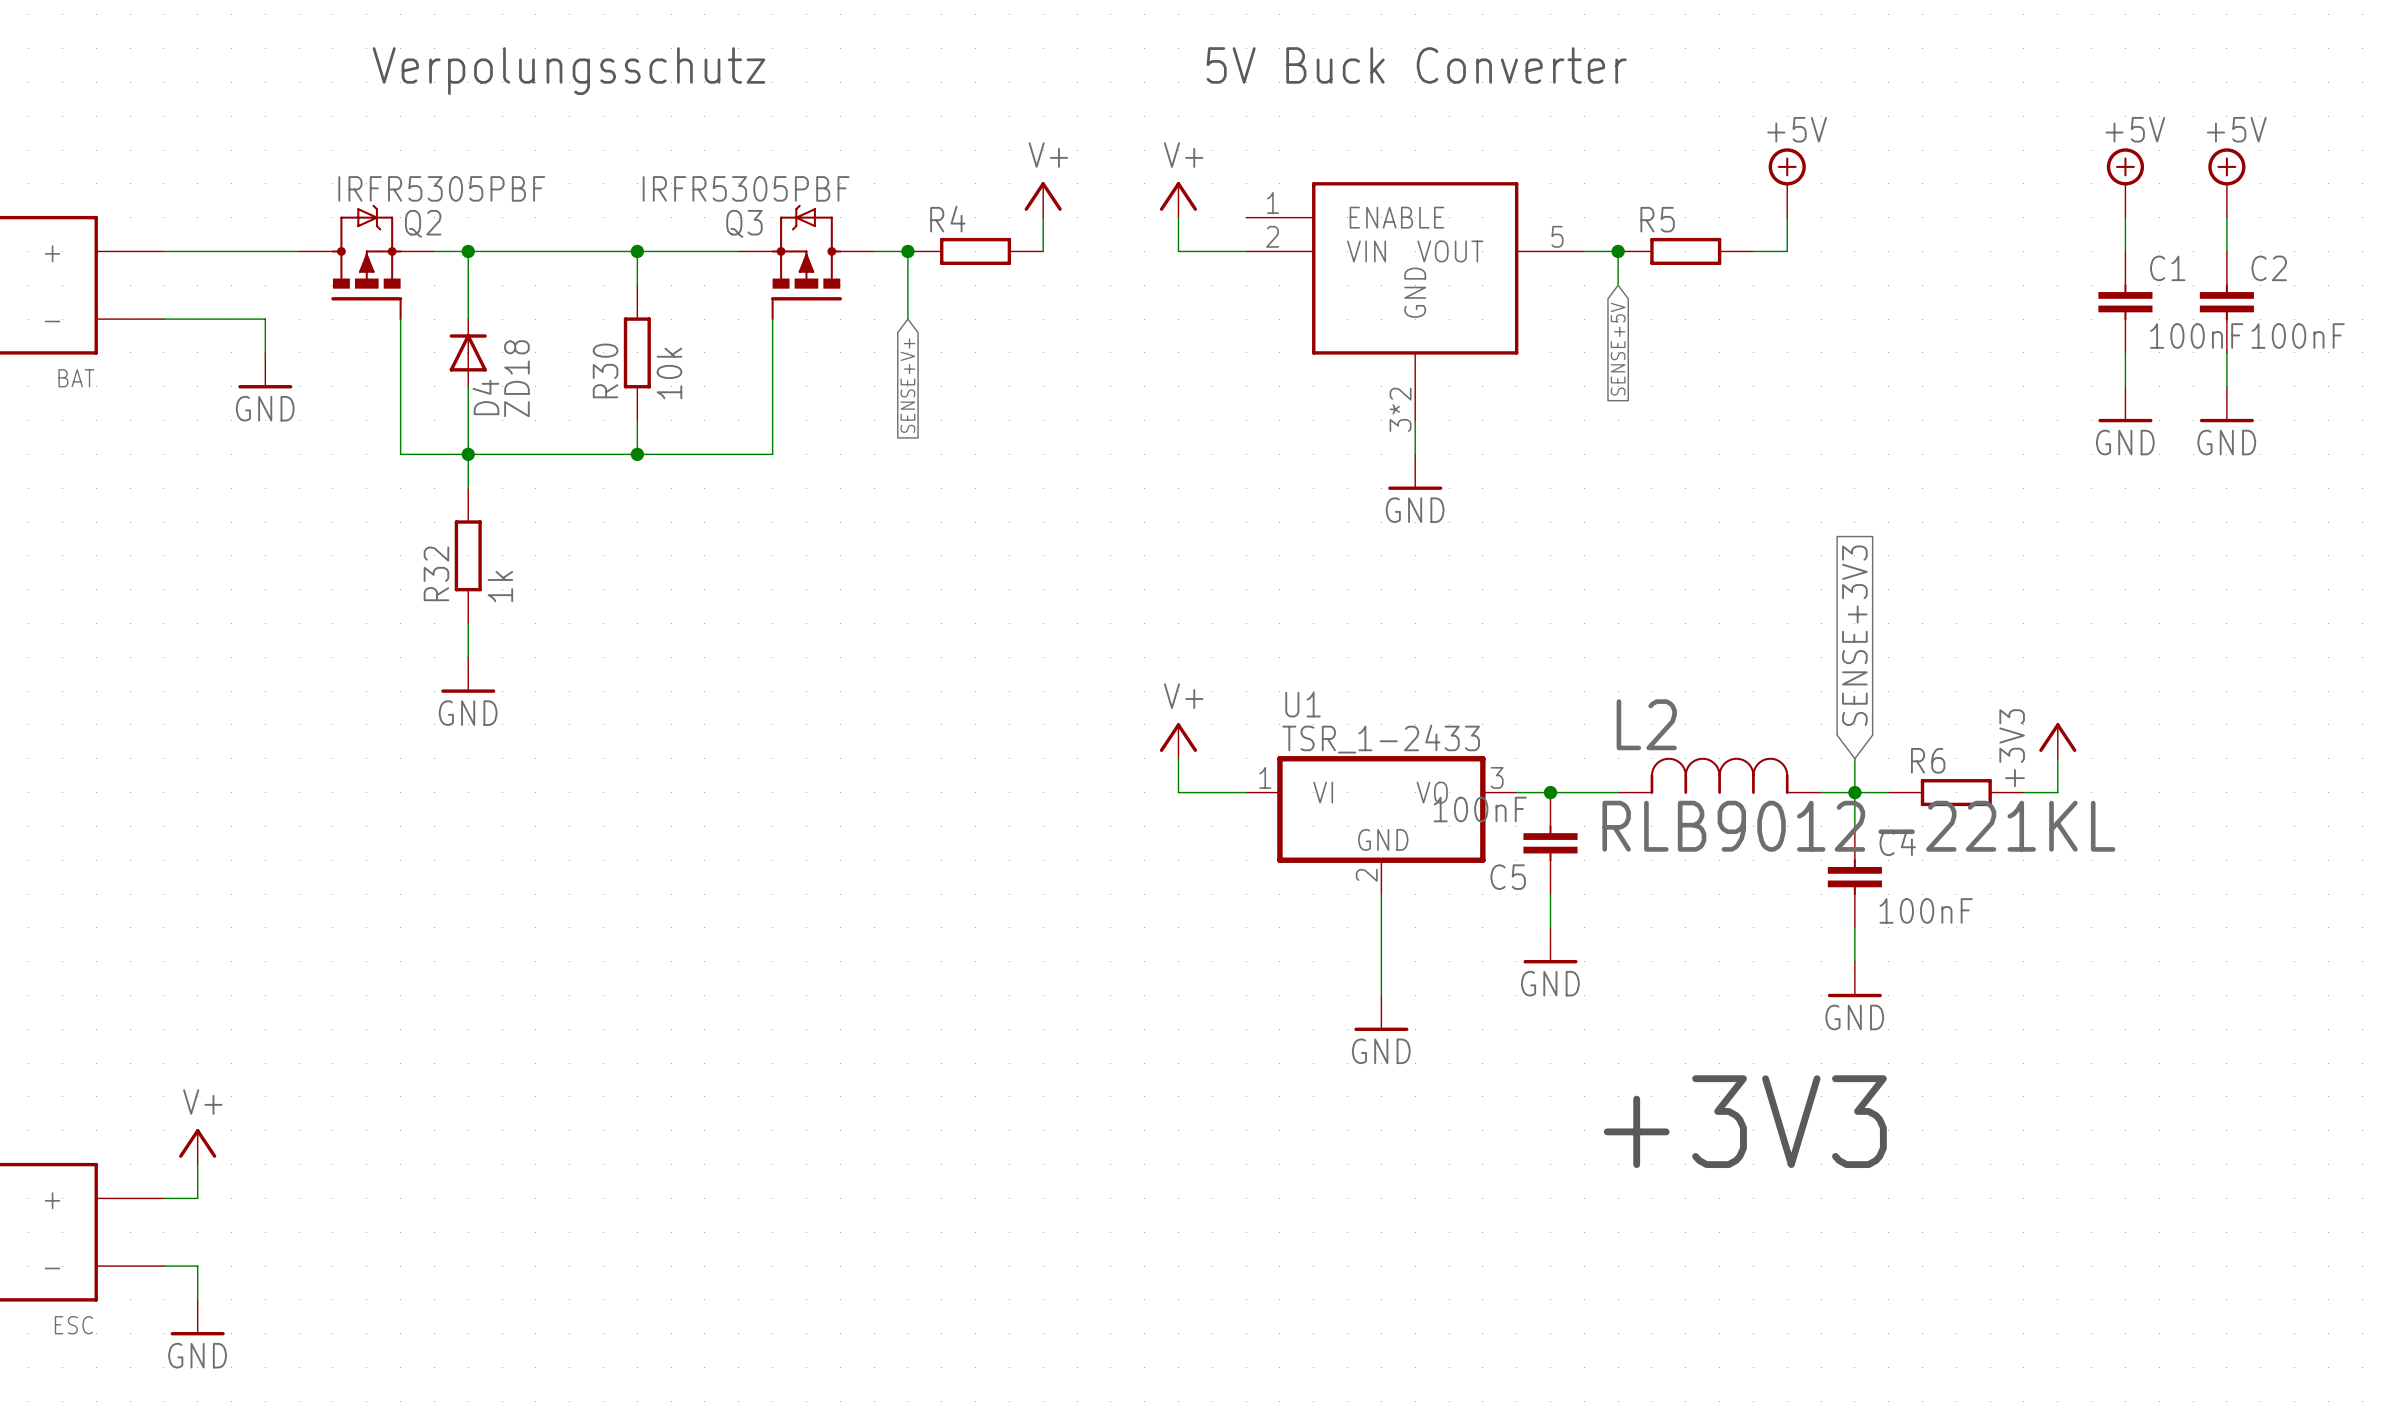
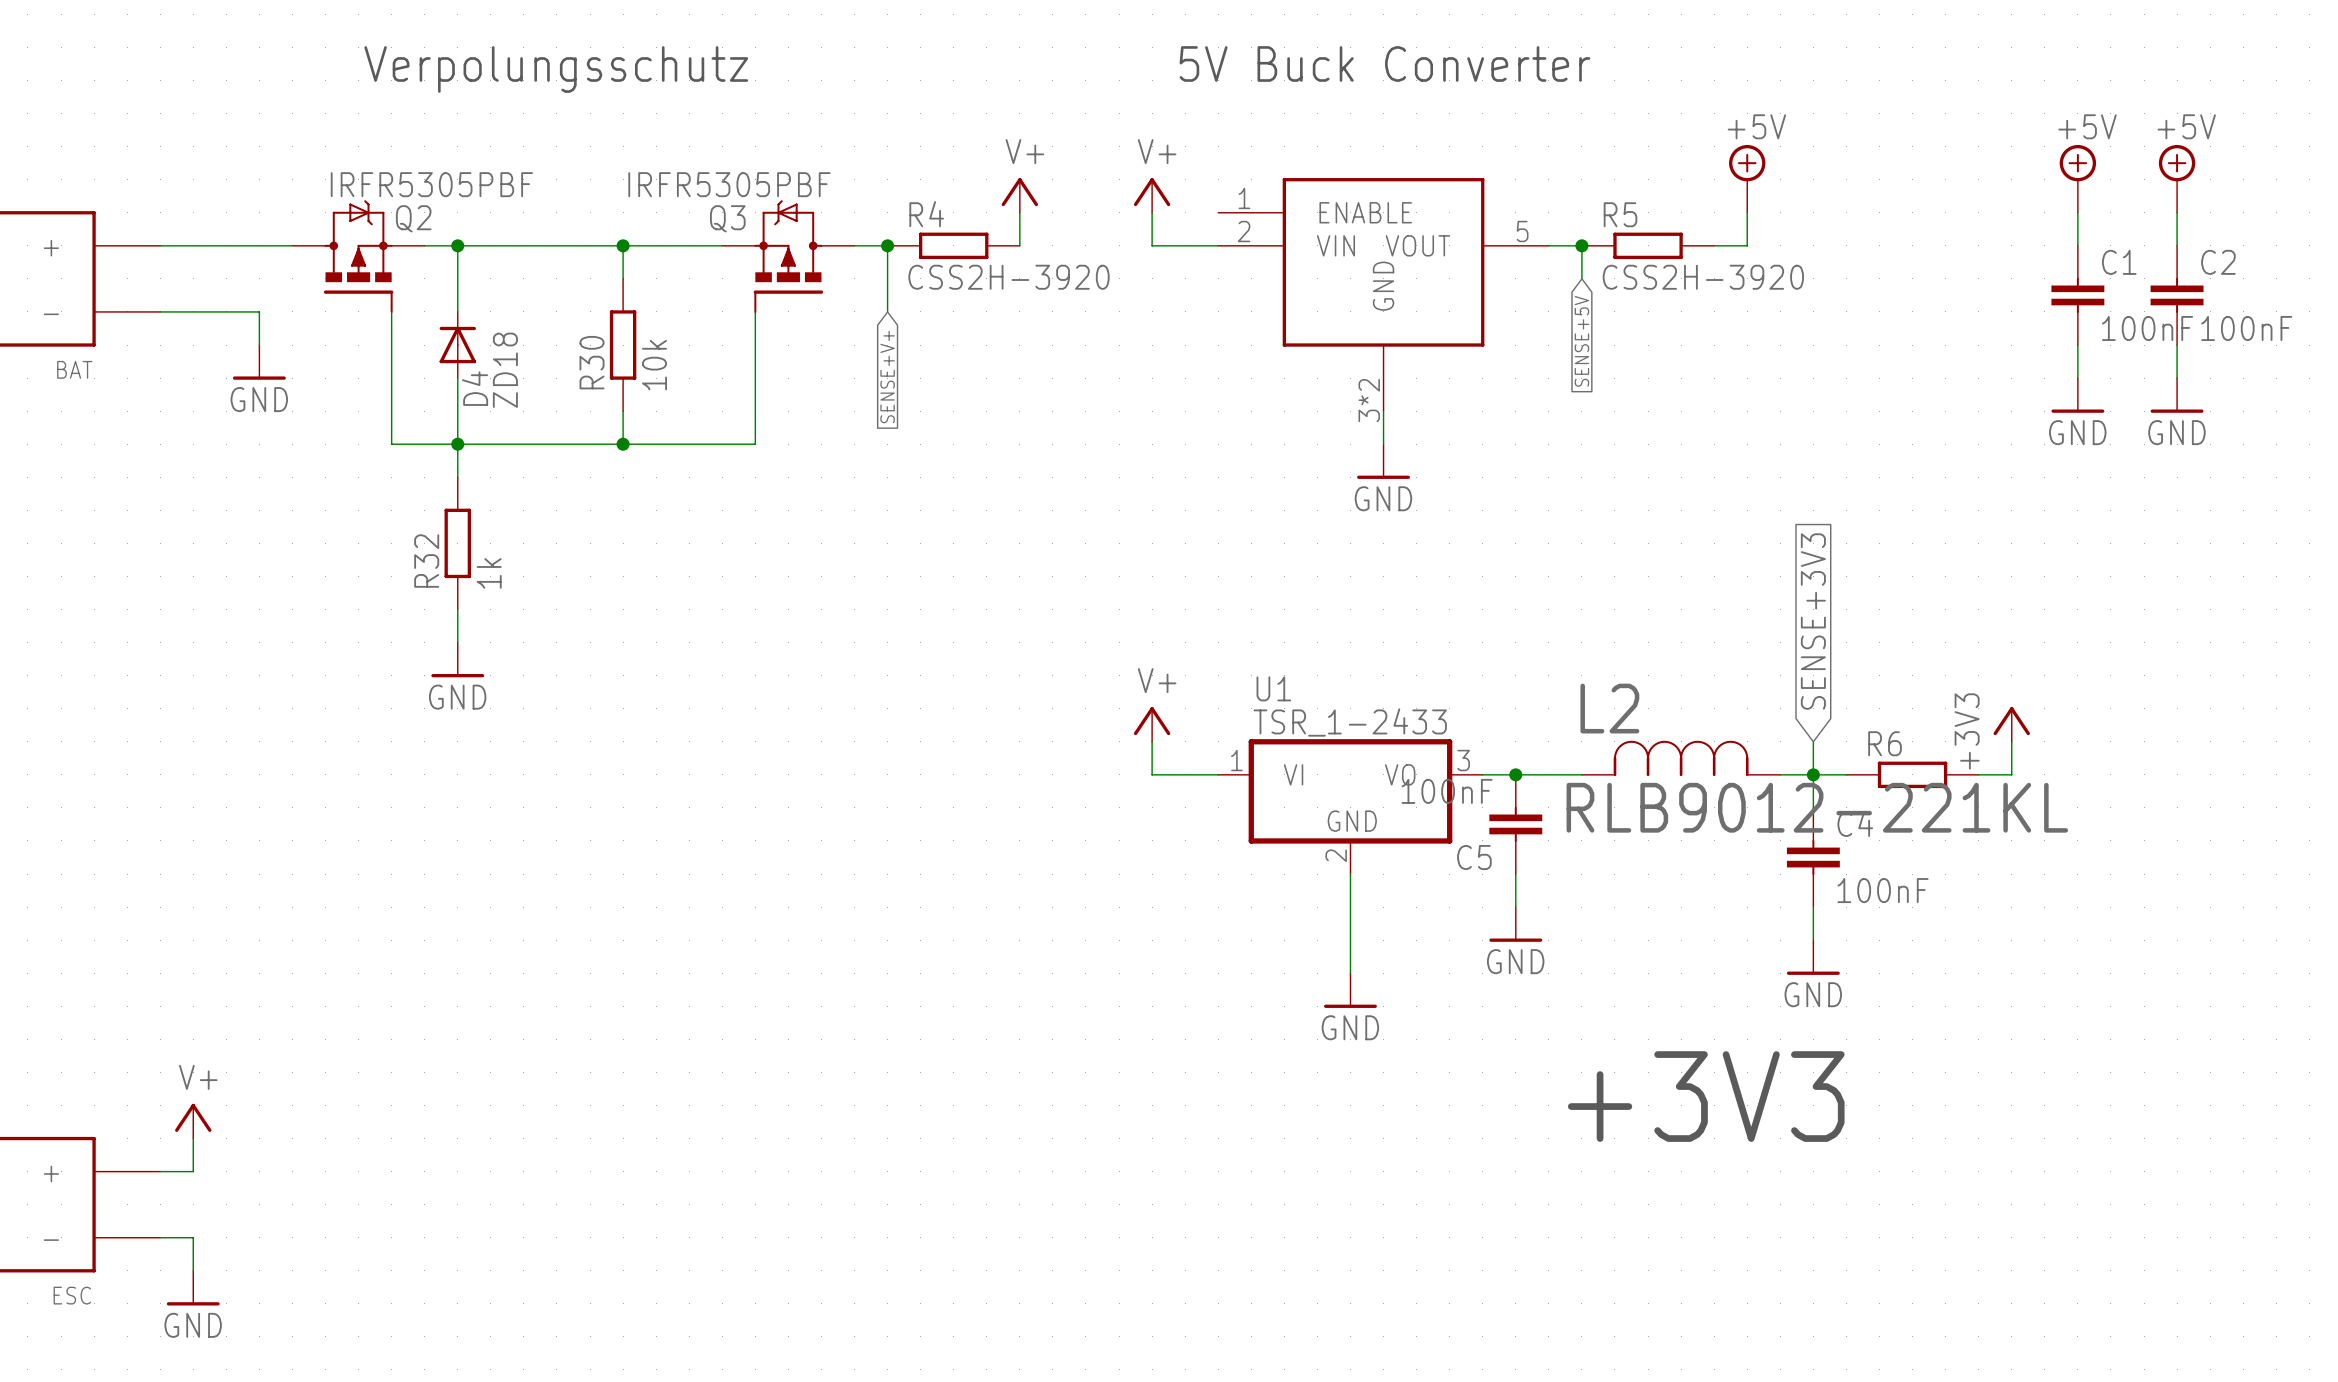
R4 value: none -> CSS2H-3920 (1008, 277)
R5 value: none -> CSS2H-3920 (1703, 277)

